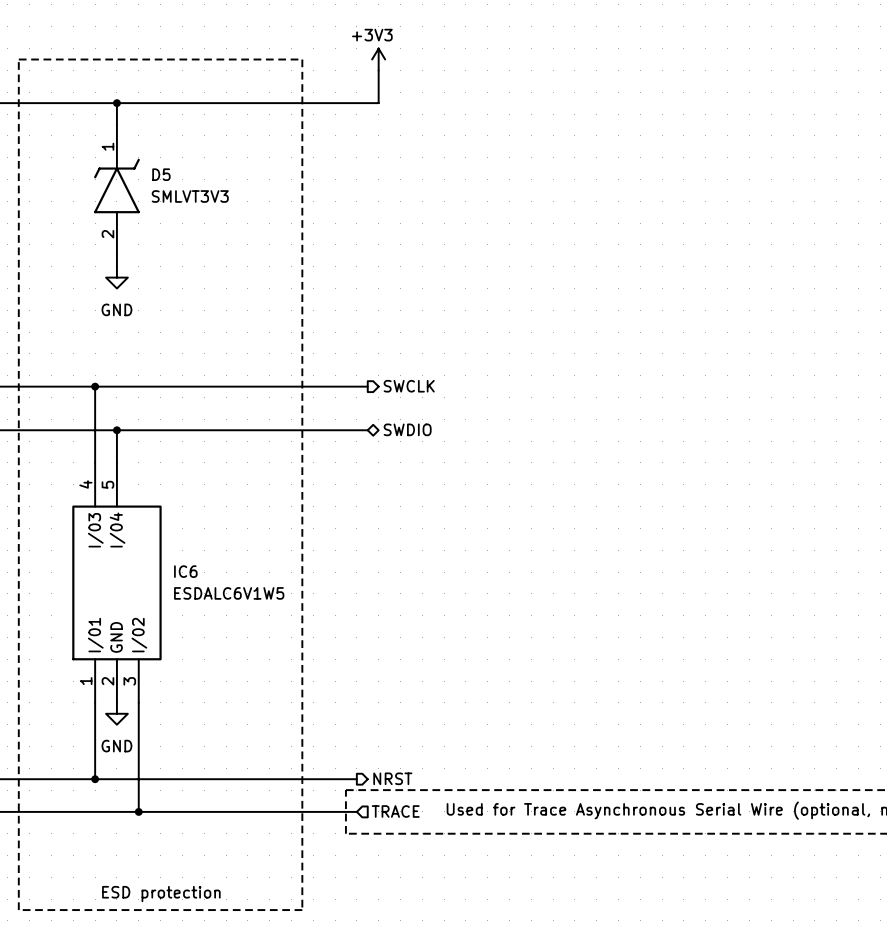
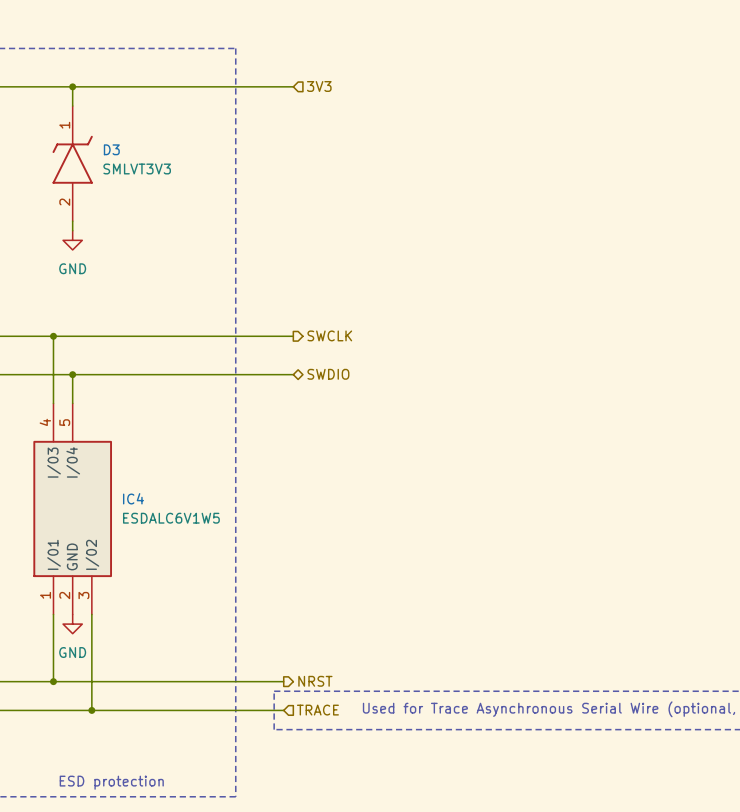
power symbol: +3V3 (378, 59) -> none
wire: (378, 70) (378, 103) (367, 103) -> none
hierarchical label: none -> 3V3 (319, 86)
D5 name: D5 (161, 174) -> D3 (111, 149)
IC6 name: IC6 (185, 571) -> IC4 (133, 498)

